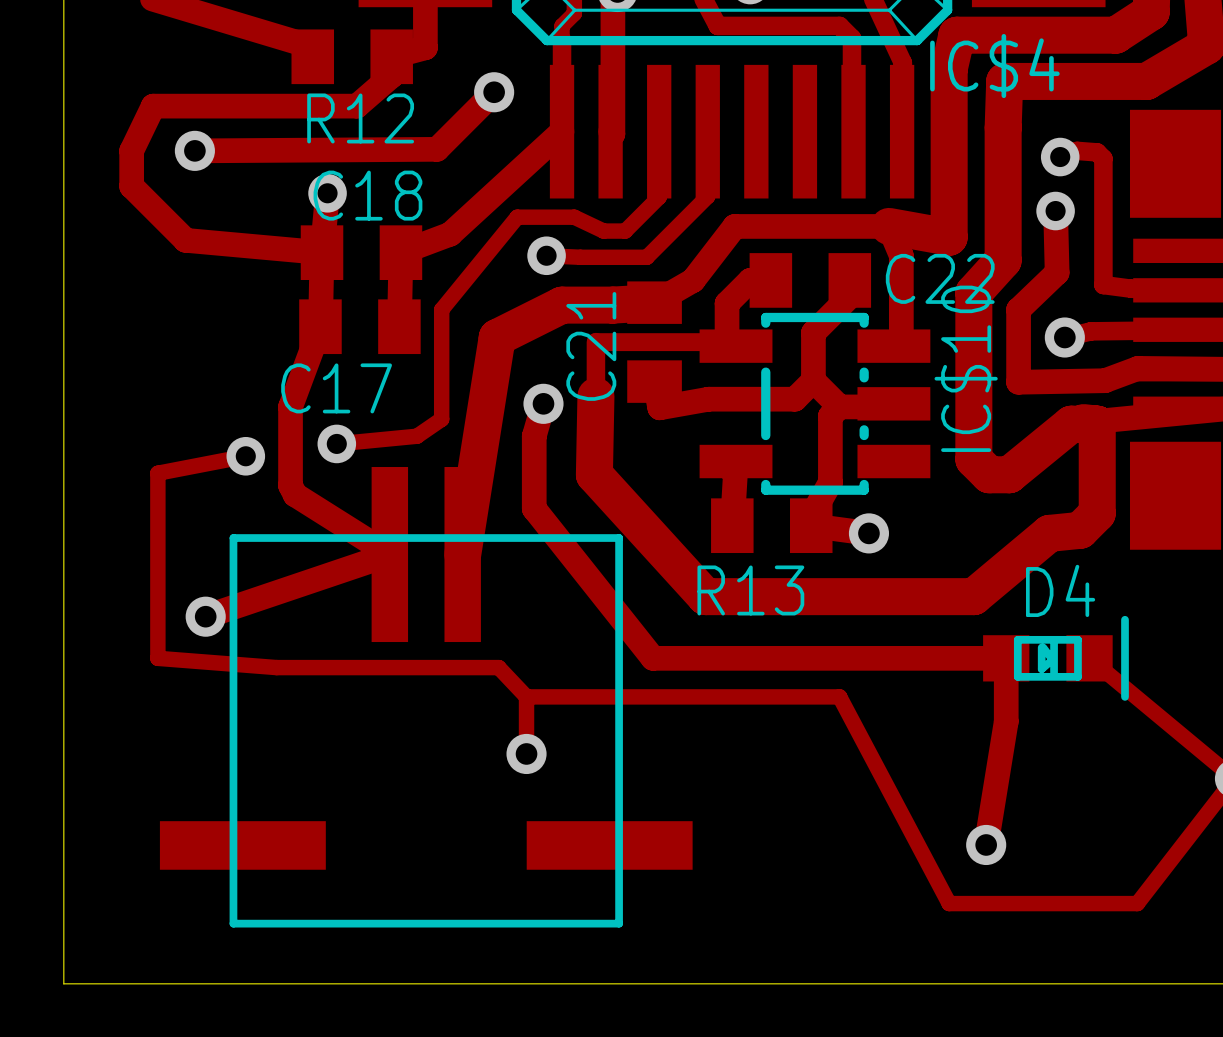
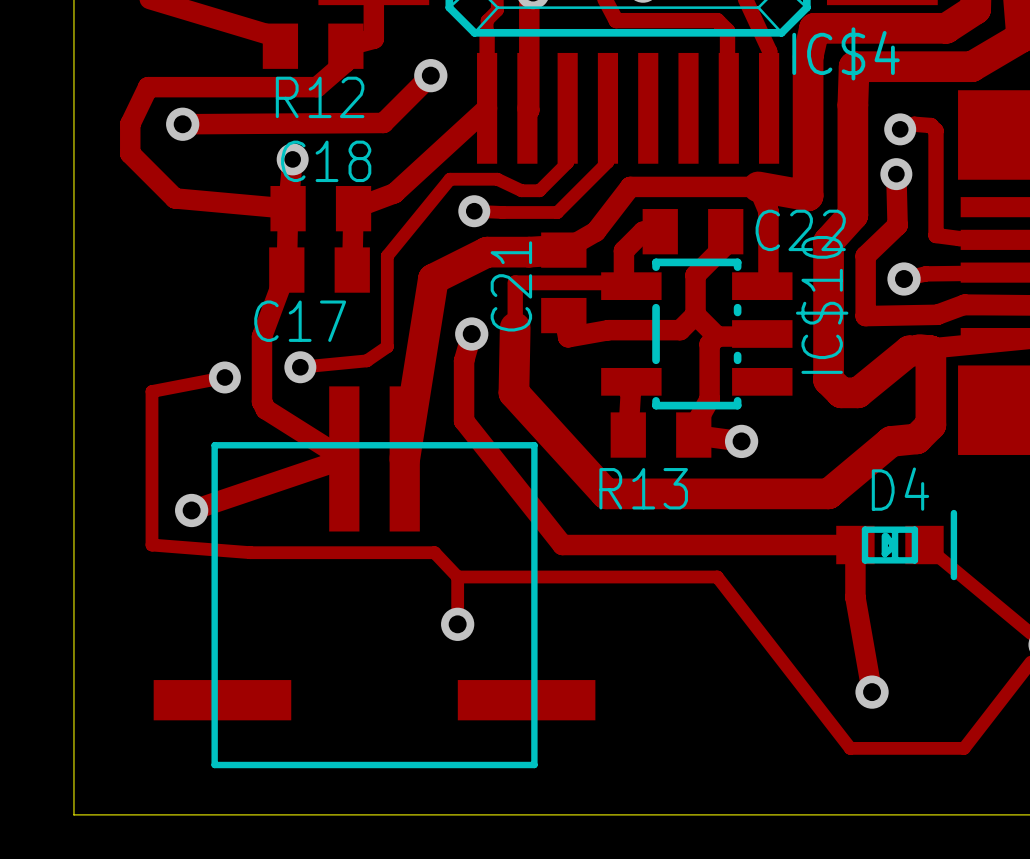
track: (839, 696) (949, 903) (1000, 903) -> (717, 577) (850, 748)
track: (1006, 721) (986, 844) -> (855, 597) (872, 692)
via position: (986, 844) -> (872, 692)

